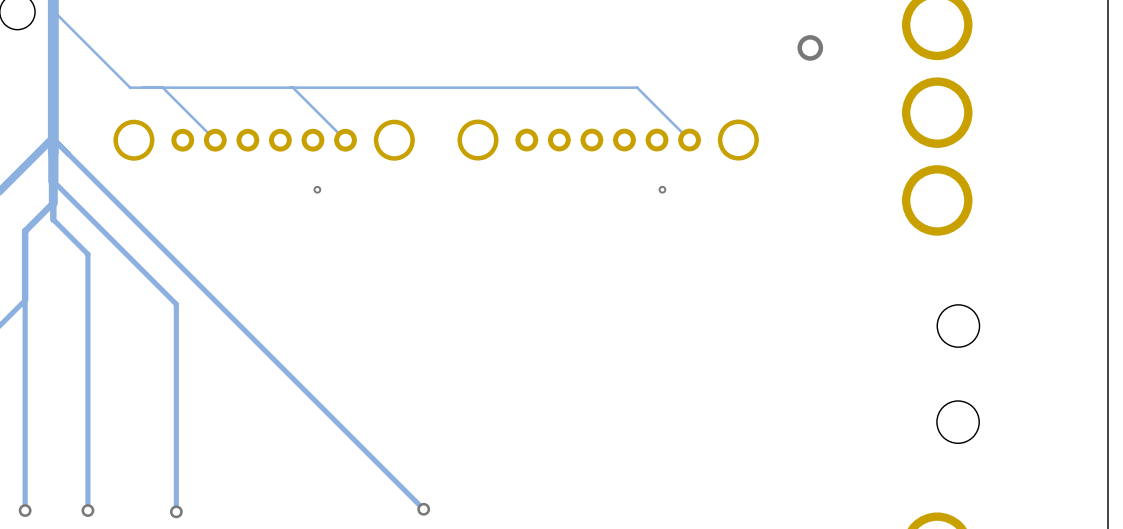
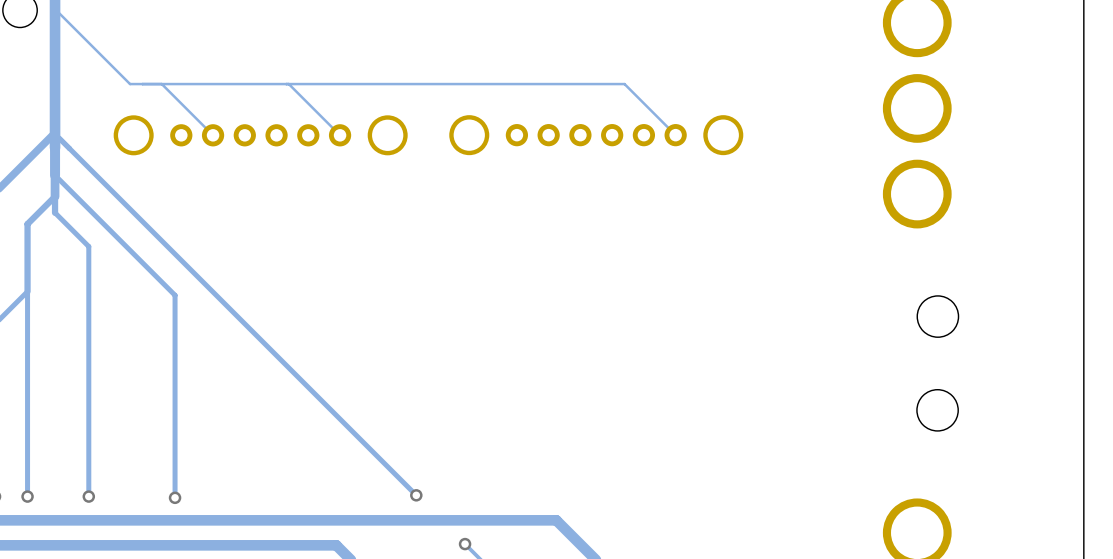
via: (810, 47) -> none
via: (317, 189) -> none
via: (662, 189) -> none

